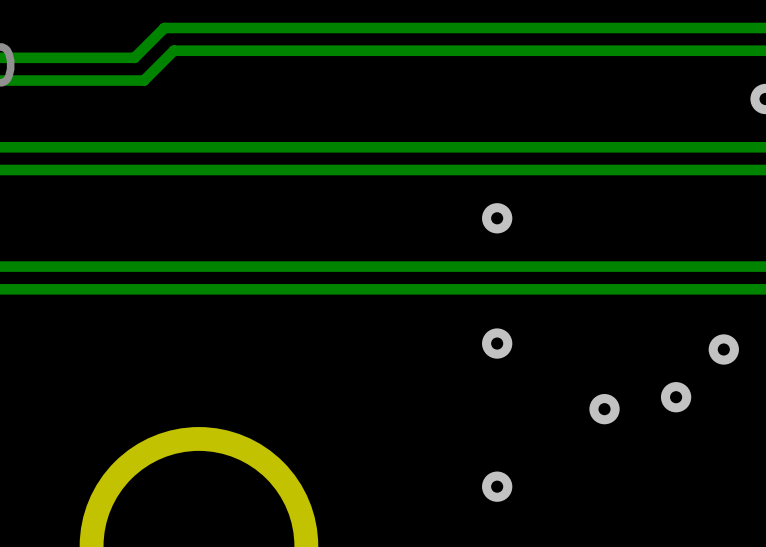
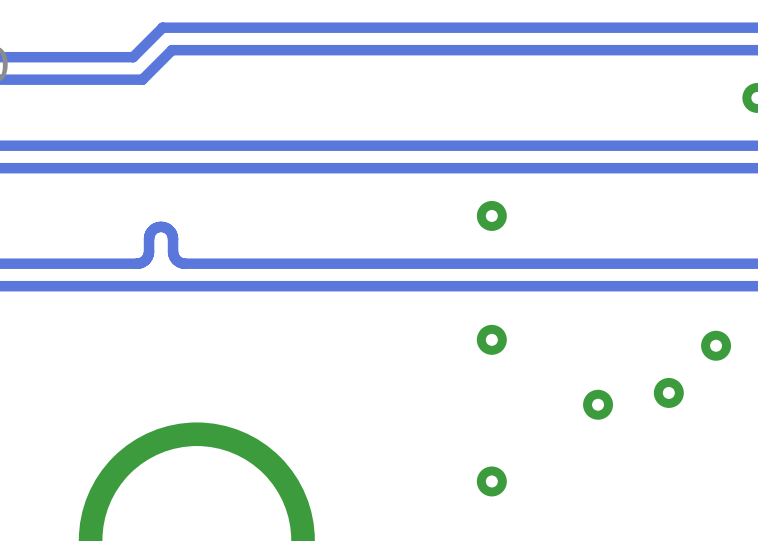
track: (187, 266) (138, 266) -> (185, 263) (177, 261) (174, 256) (172, 236) (170, 231) (161, 226) (153, 229) (150, 233) (148, 254) (146, 259) (137, 263)

